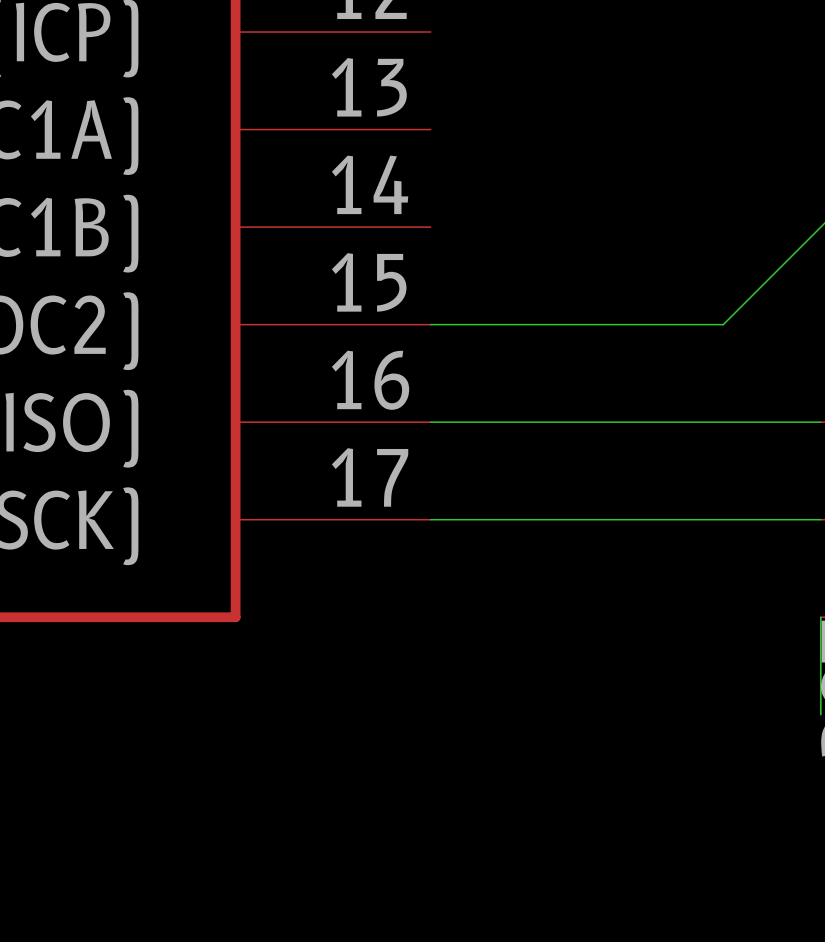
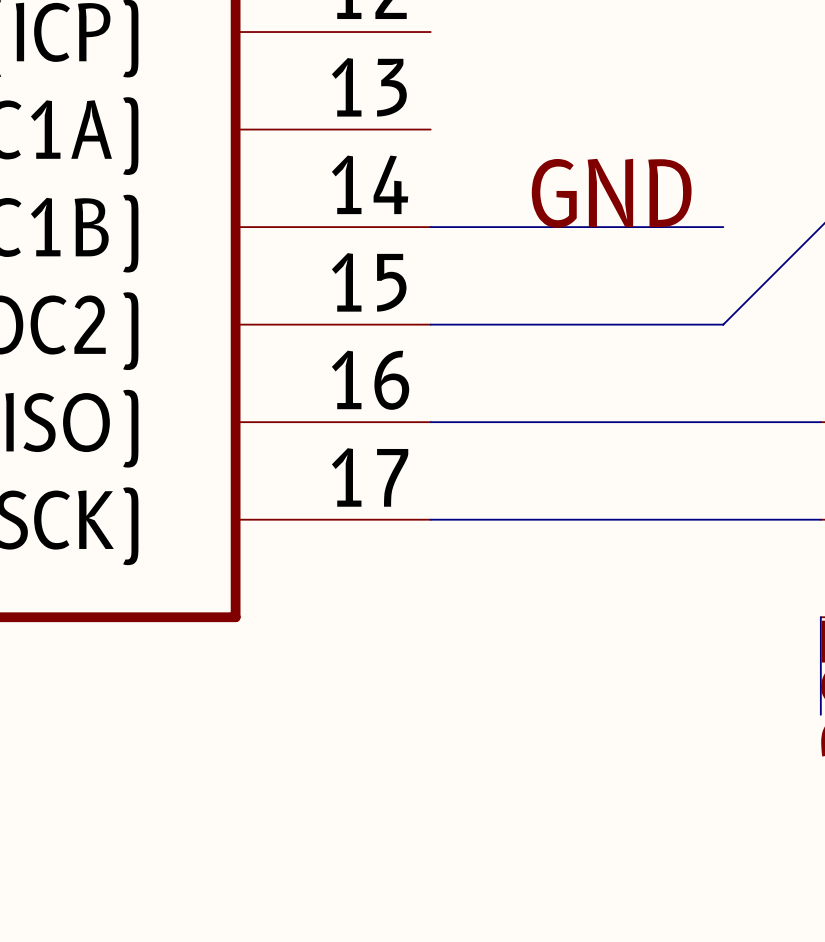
label: none -> GND (611, 193)
wire: none -> (430, 227) (723, 227)

